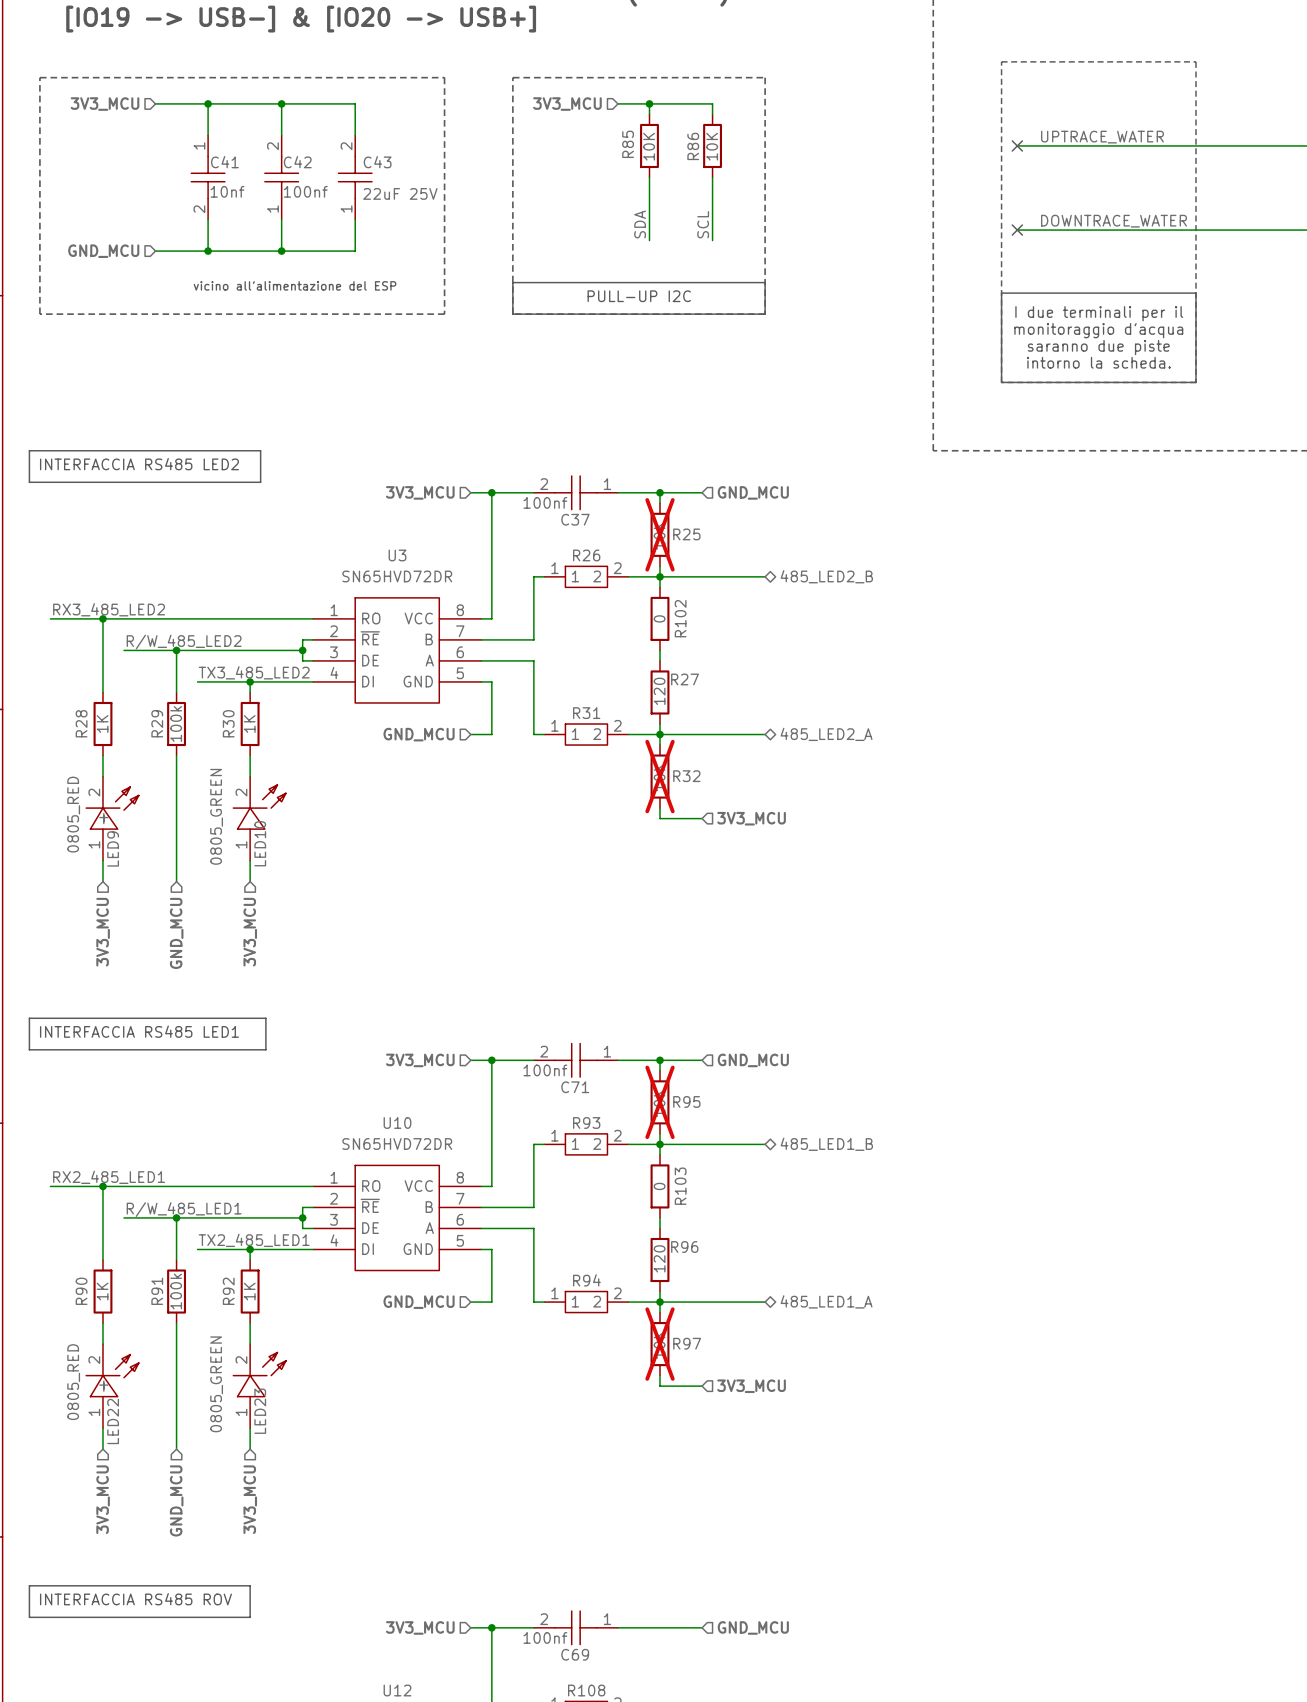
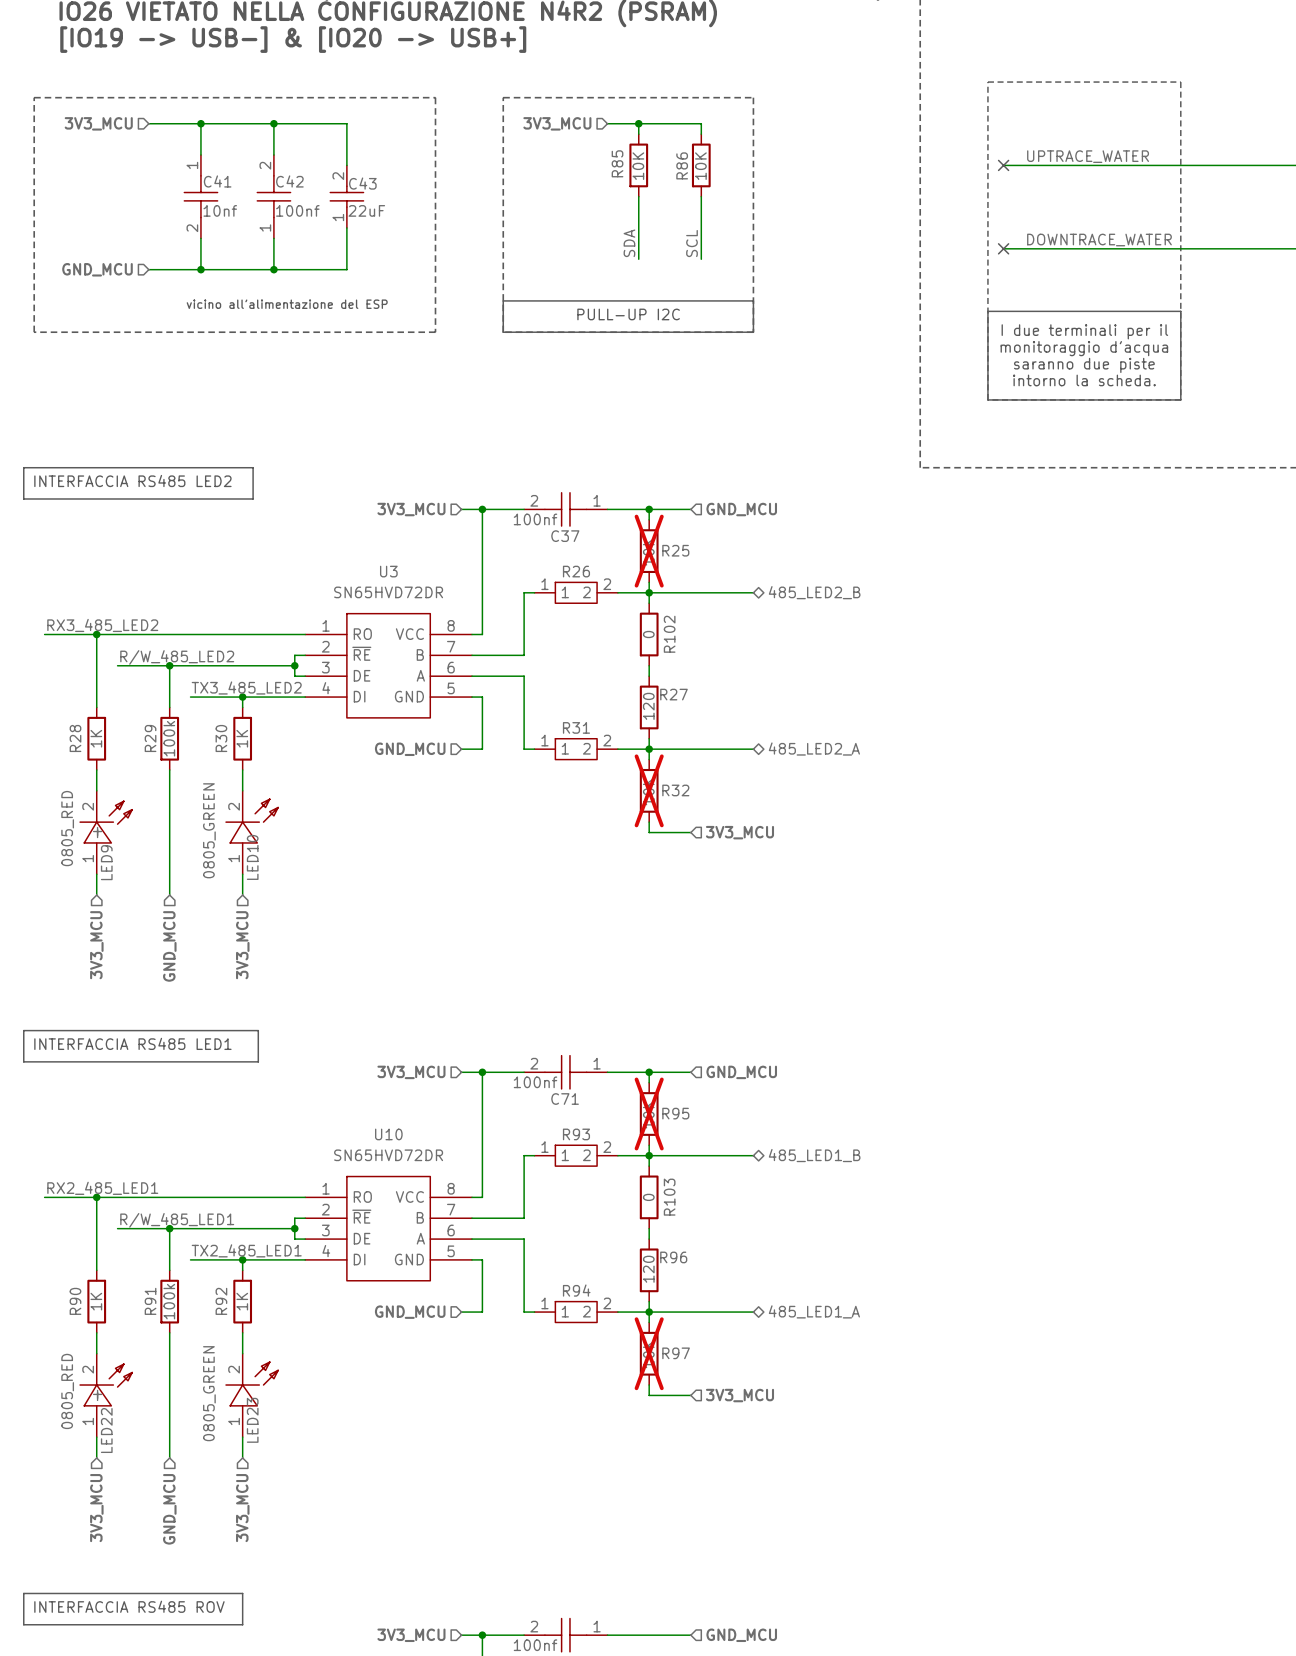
C43 symbol: [338, 135, 373, 220] -> [330, 165, 364, 228]
C43 value: 22uF 25V (400, 193) -> 22uF (366, 210)

